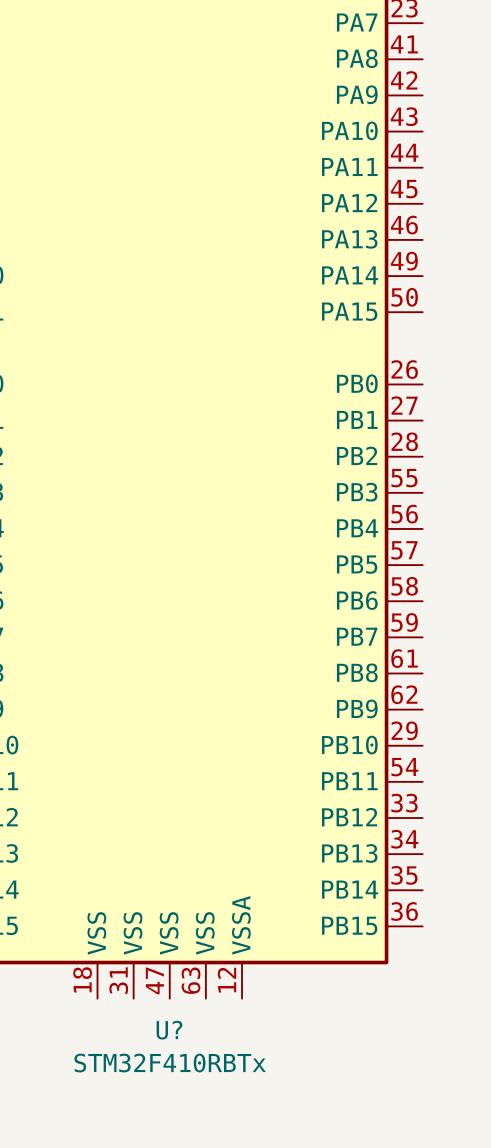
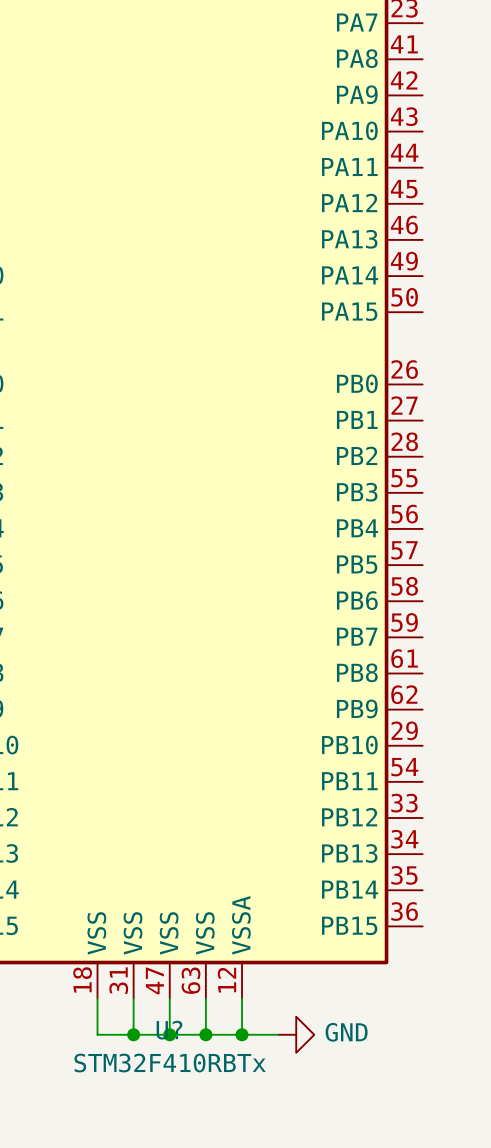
wire: none -> (97, 998) (97, 1034) (278, 1034)
wire: none -> (133, 998) (133, 1034)
wire: none -> (169, 998) (169, 1034)
wire: none -> (205, 998) (205, 1034)
wire: none -> (242, 998) (242, 1034)
junction: none -> (133, 1034)
junction: none -> (169, 1034)
junction: none -> (205, 1034)
junction: none -> (242, 1034)
power symbol: none -> GND (296, 1034)

